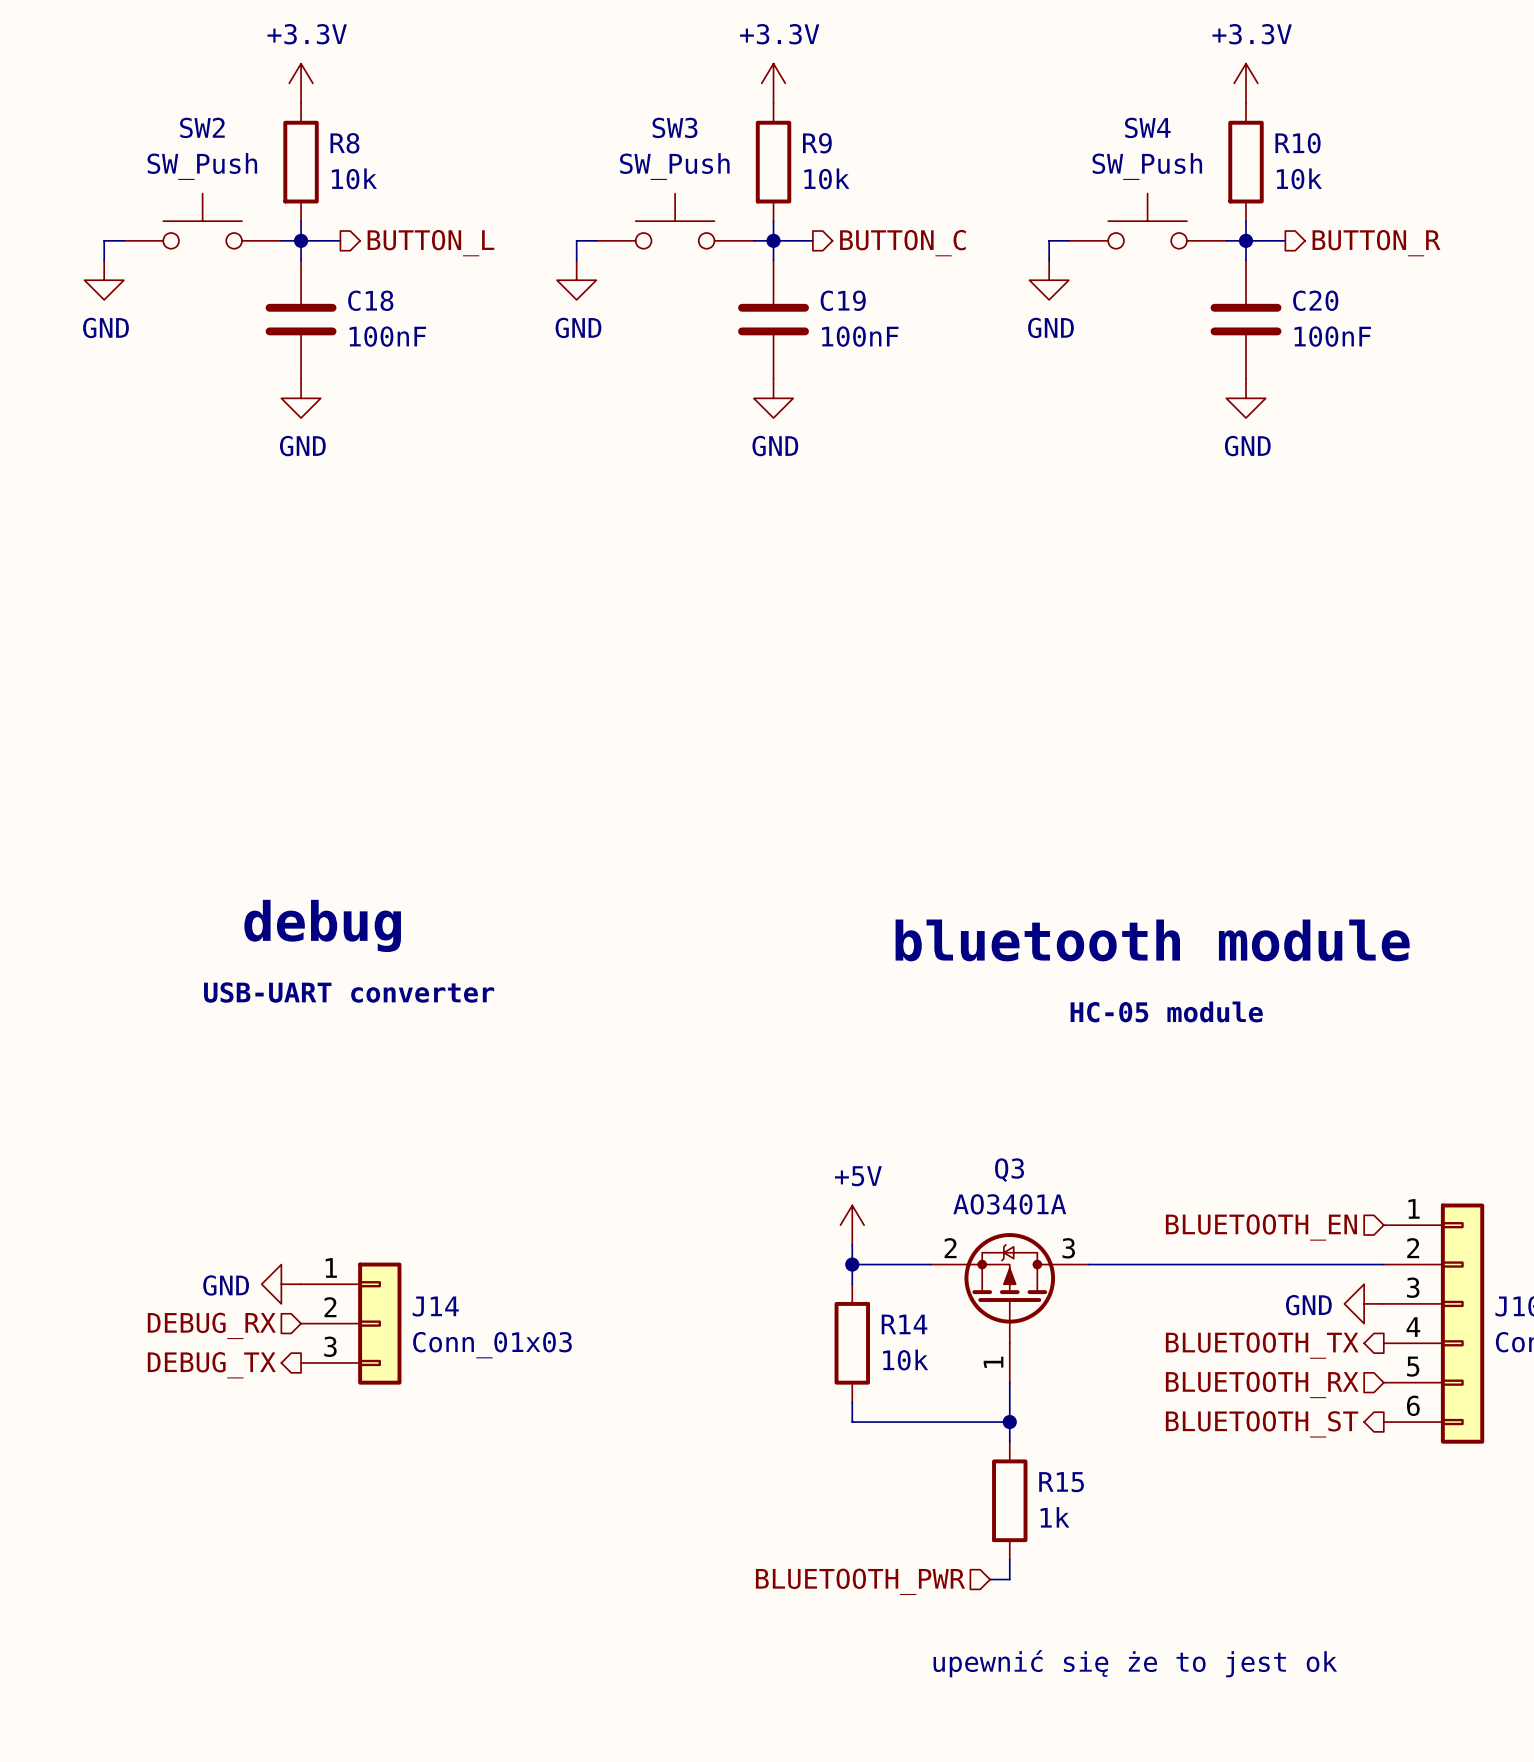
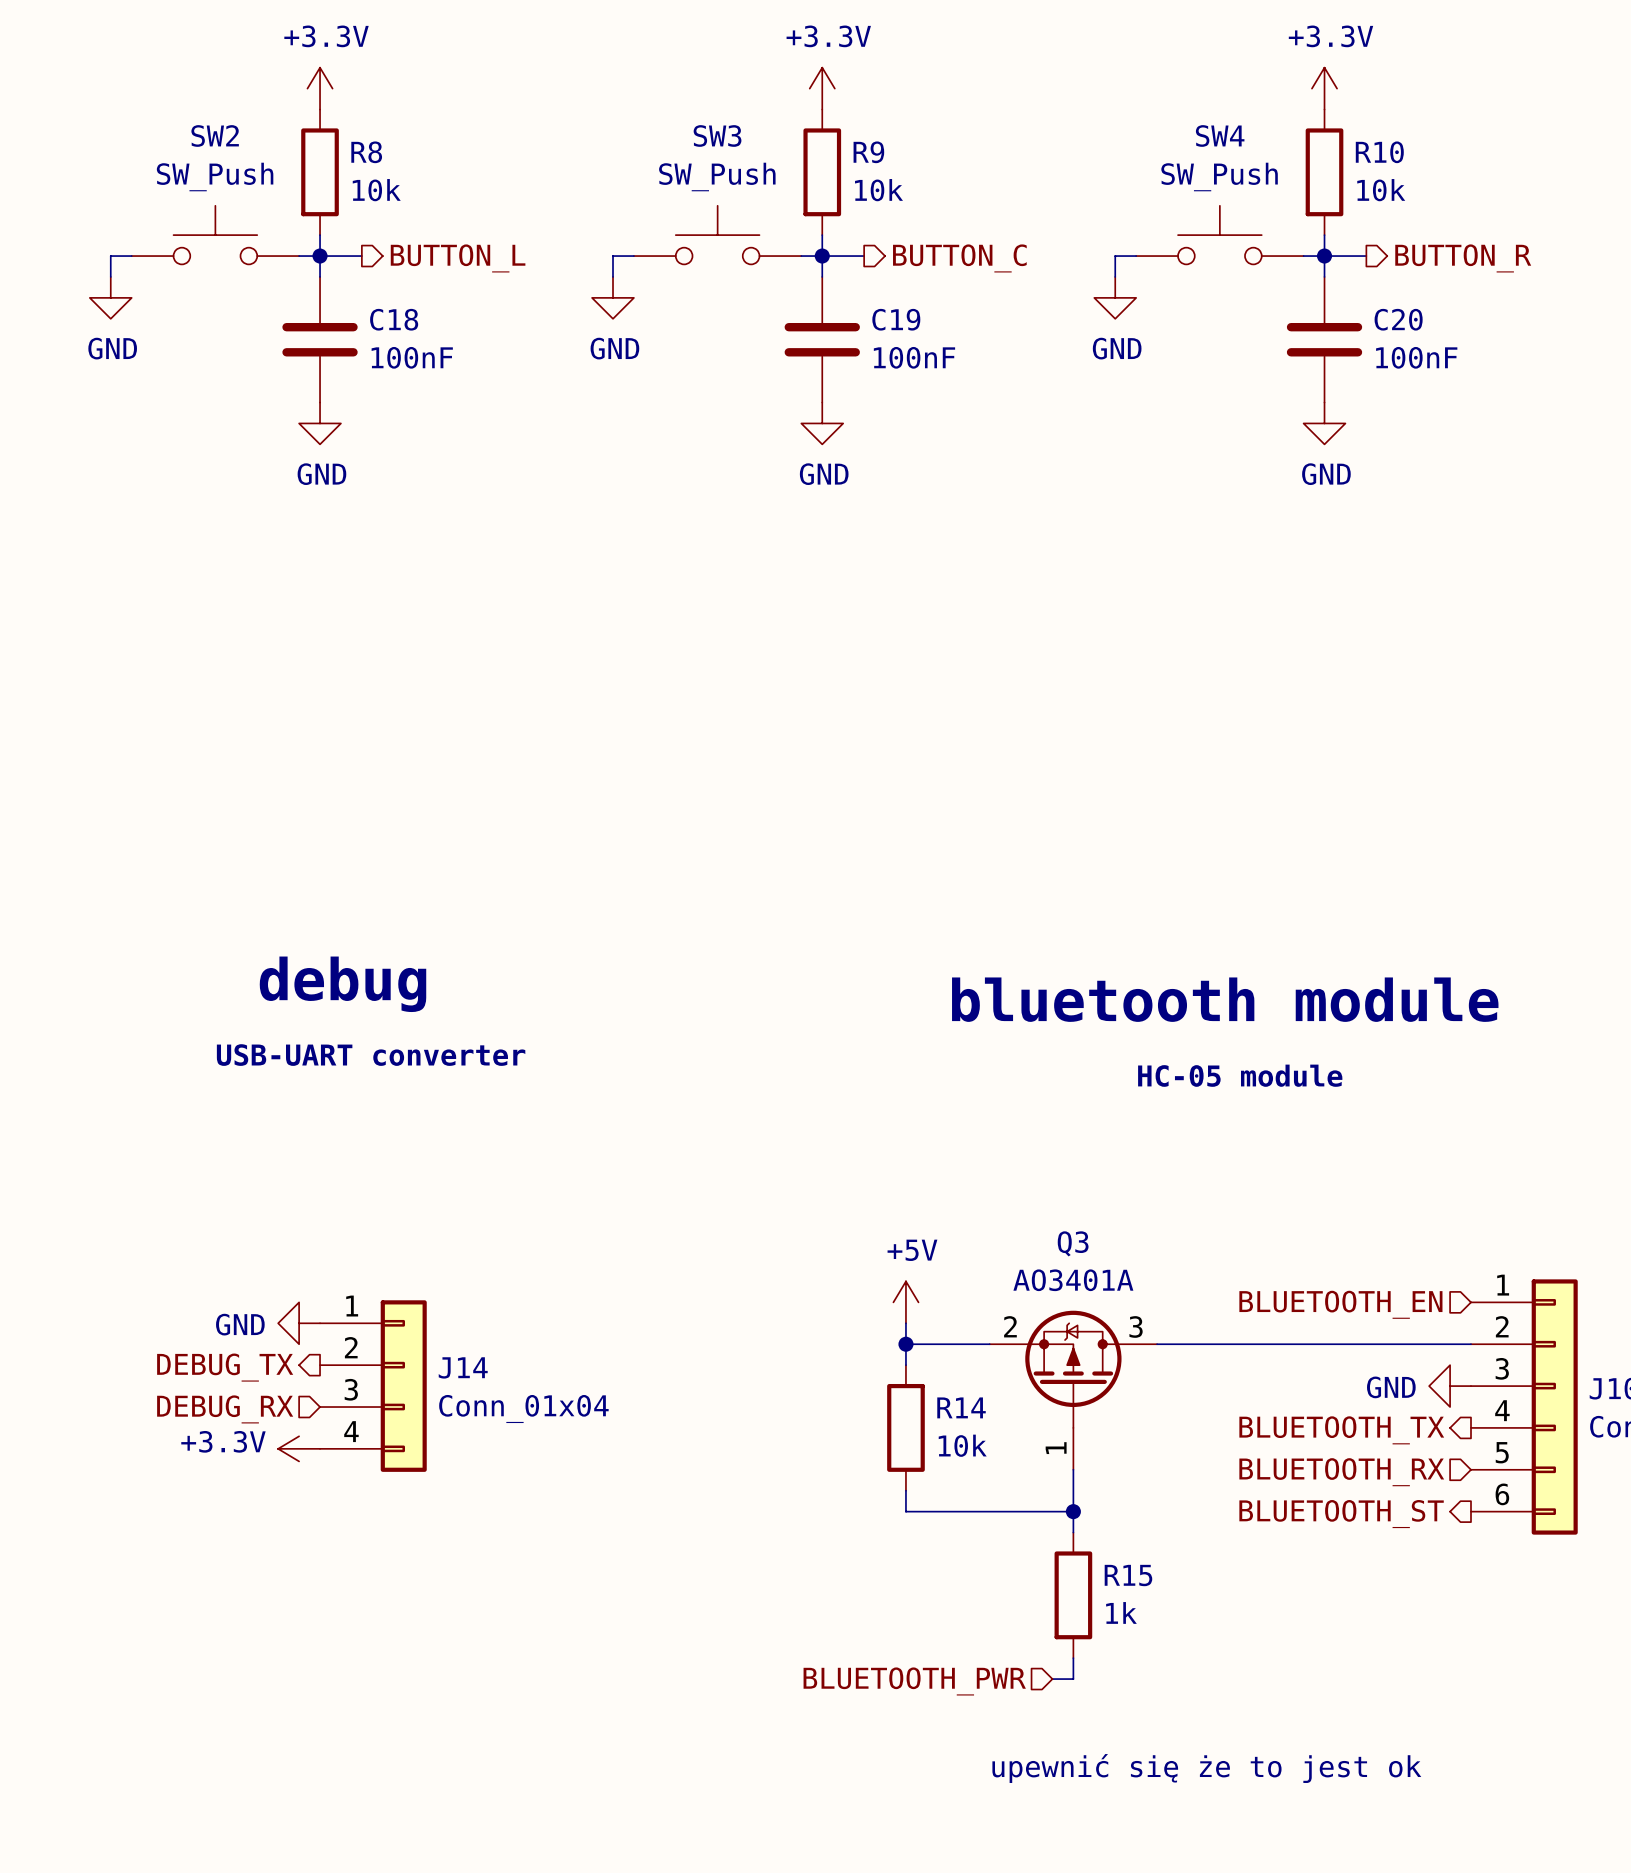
J14 symbol: [301, 1262, 402, 1385] -> [320, 1300, 427, 1472]
power symbol position: GND (281, 1284) -> GND (299, 1323)
J14 value: Conn_01x03 (492, 1345) -> Conn_01x04 (523, 1409)
power symbol: none -> +3.3V (299, 1448)
hierarchical label position: DEBUG_TX (211, 1365) -> DEBUG_TX (225, 1367)

